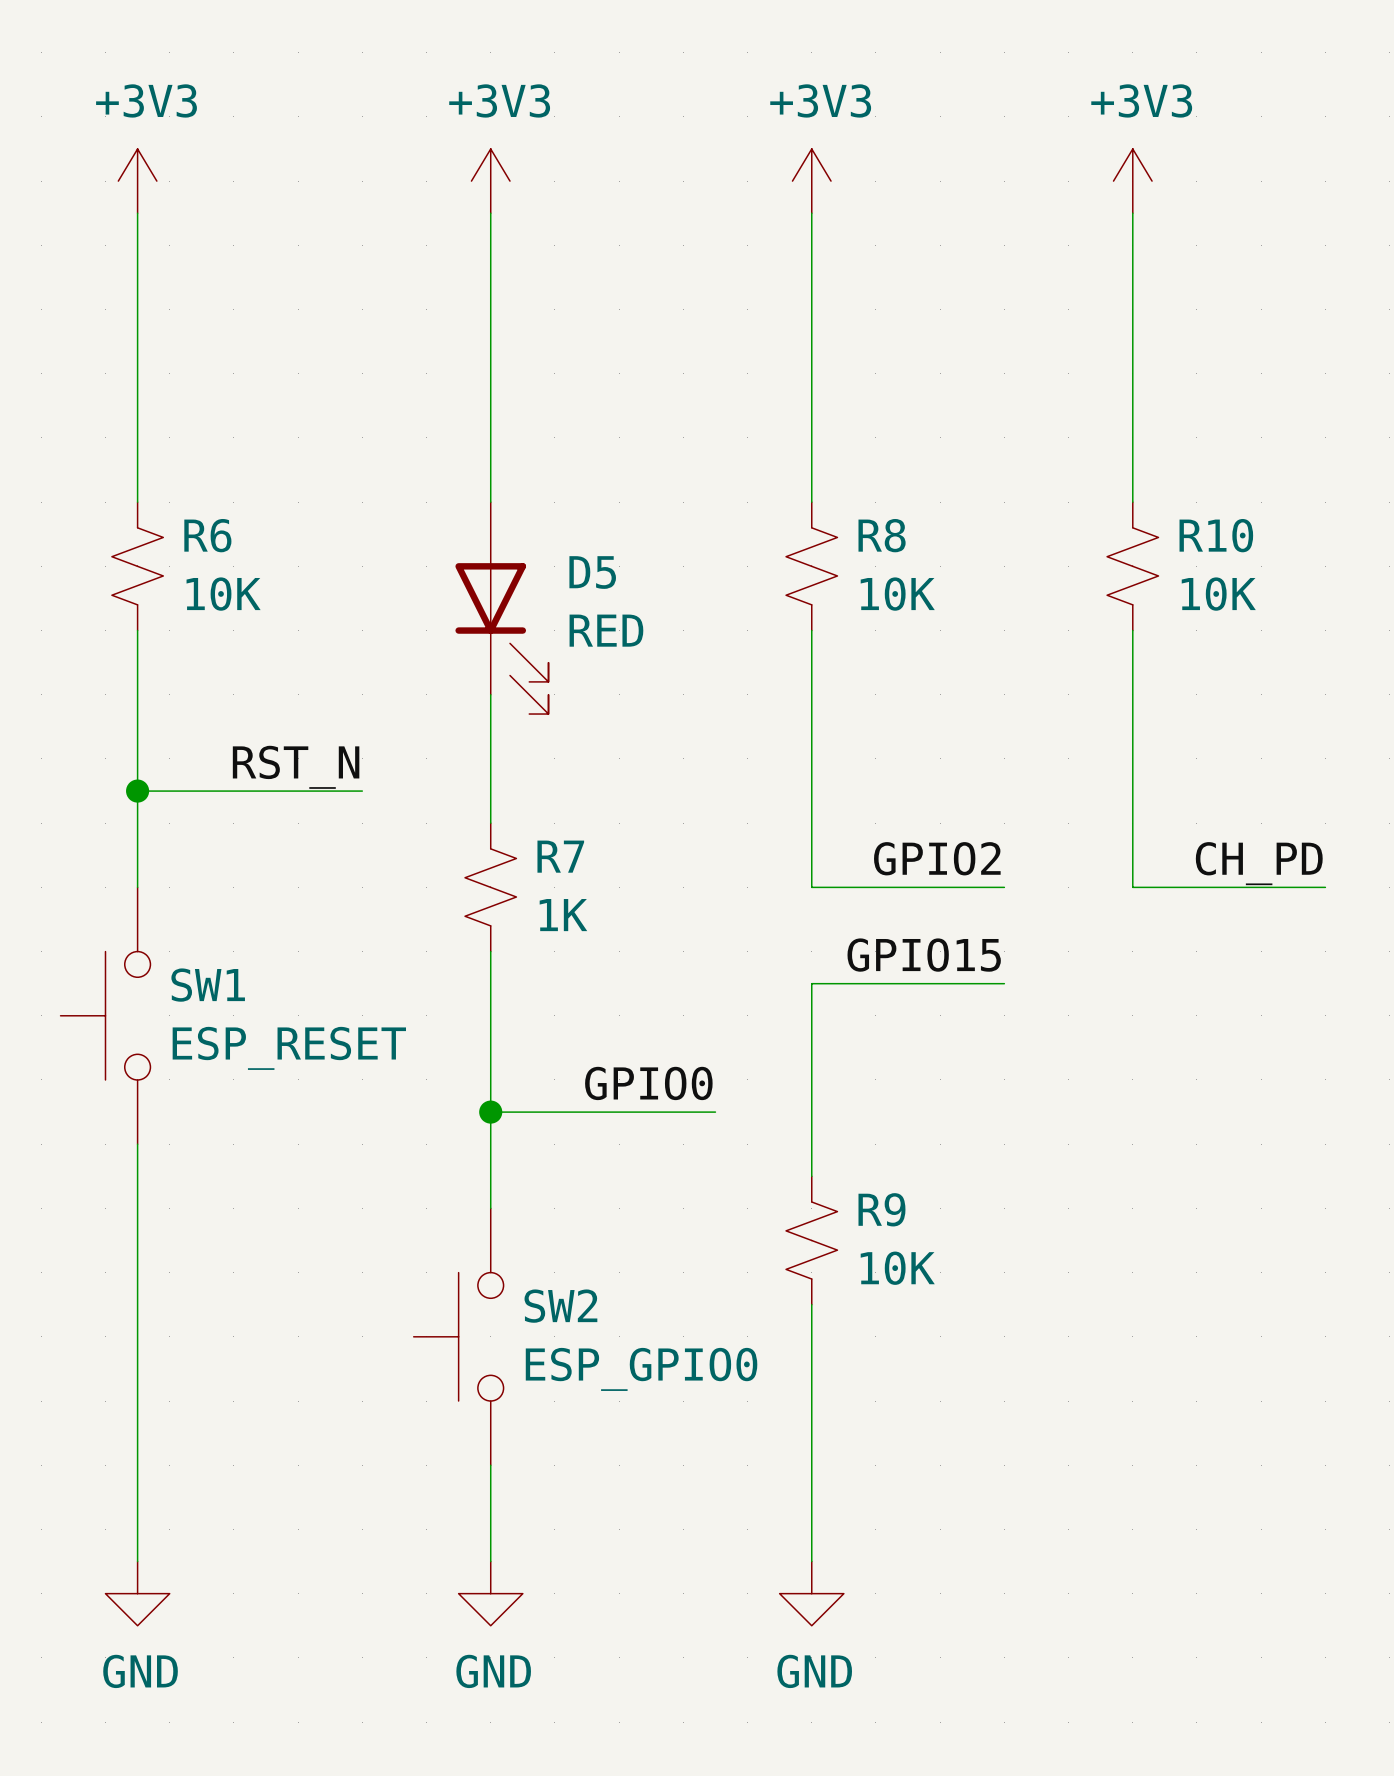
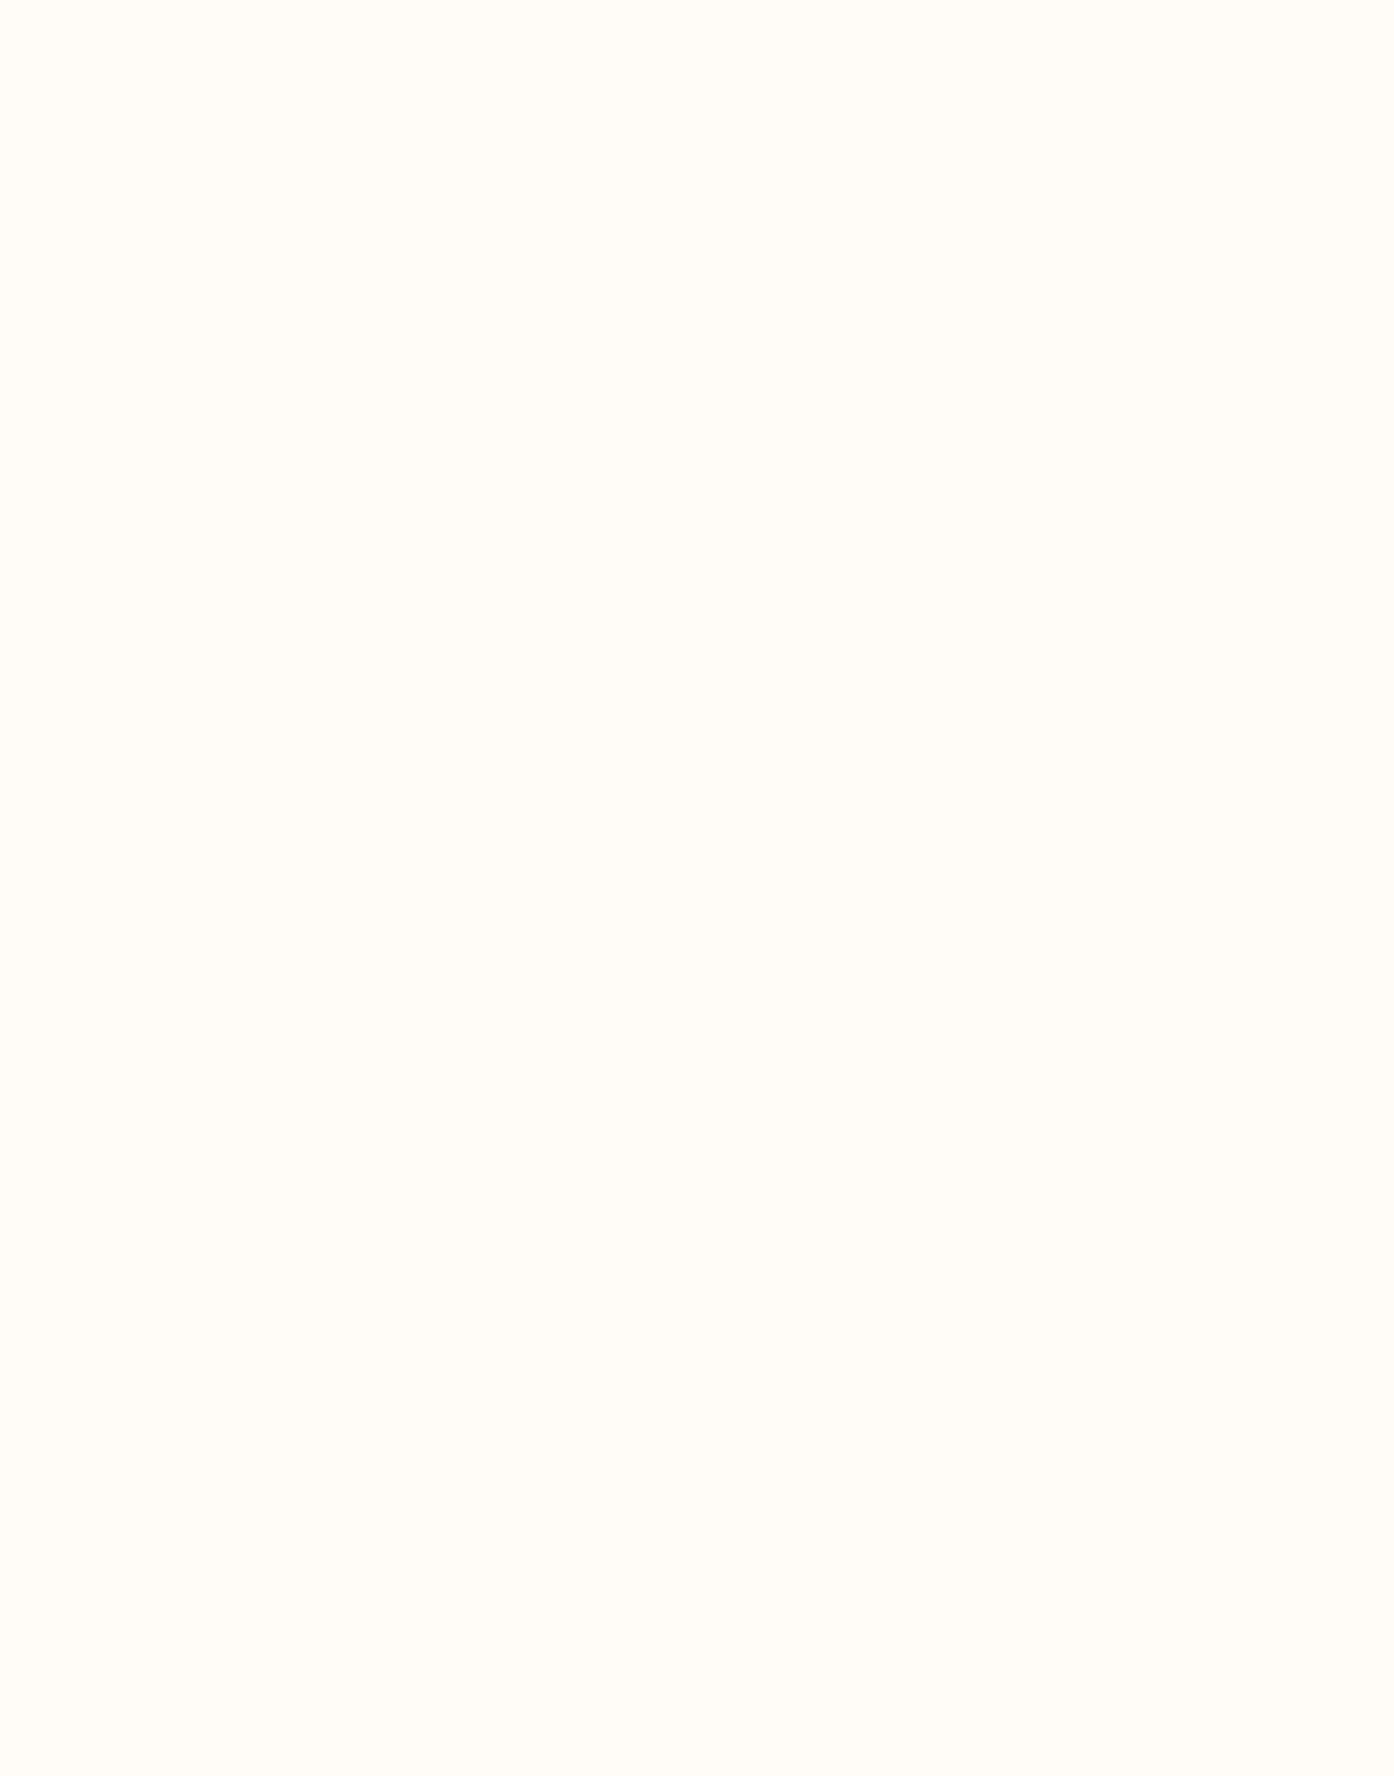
power symbol: +3V3 (137, 181) -> none
power symbol: +3V3 (490, 181) -> none
power symbol: +3V3 (811, 181) -> none
power symbol: +3V3 (1132, 181) -> none
wire: (137, 213) (137, 502) -> none
wire: (490, 213) (490, 502) -> none
wire: (811, 213) (811, 502) -> none
wire: (1132, 213) (1132, 502) -> none
R6: 10K (137, 566) -> none
R8: 10K (811, 566) -> none
R10: 10K (1132, 566) -> none
D5: RED (501, 608) -> none
wire: (137, 630) (137, 887) -> none
wire: (811, 630) (811, 887) (1004, 887) -> none
wire: (1132, 630) (1132, 887) (1325, 887) -> none
wire: (490, 694) (490, 823) -> none
label: RST_N (296, 767) -> none
wire: (137, 791) (362, 791) -> none
junction: (137, 791) -> none
label: GPIO2 (937, 858) -> none
label: CH_PD (1259, 863) -> none
R7: 1K (490, 887) -> none
wire: (490, 951) (490, 1208) -> none
label: GPIO15 (924, 955) -> none
wire: (1004, 983) (811, 983) (811, 1176) -> none
SW1: ESP_RESET (105, 1015) -> none
label: GPIO0 (648, 1083) -> none
wire: (490, 1112) (715, 1112) -> none
junction: (490, 1112) -> none
wire: (137, 1144) (137, 1561) -> none
R9: 10K (811, 1240) -> none
wire: (811, 1304) (811, 1561) -> none
SW2: ESP_GPIO0 (458, 1336) -> none
wire: (490, 1465) (490, 1561) -> none
power symbol: GND (137, 1593) -> none
power symbol: GND (490, 1593) -> none
power symbol: GND (811, 1593) -> none

